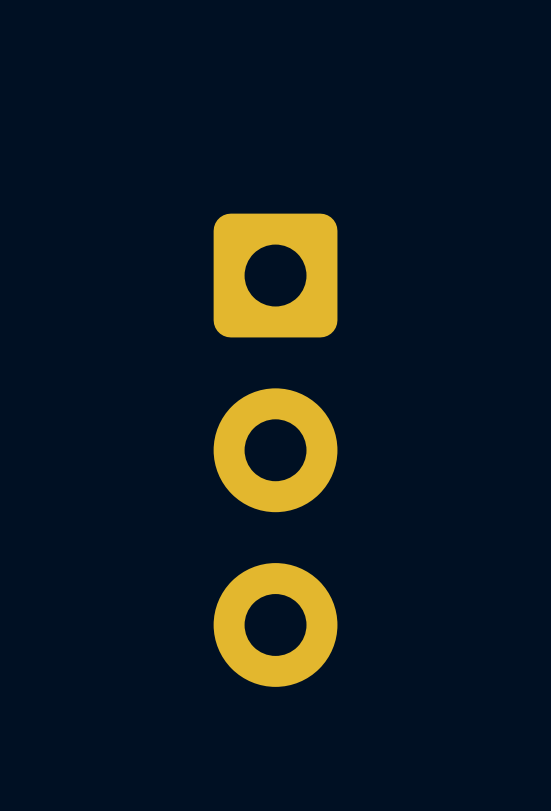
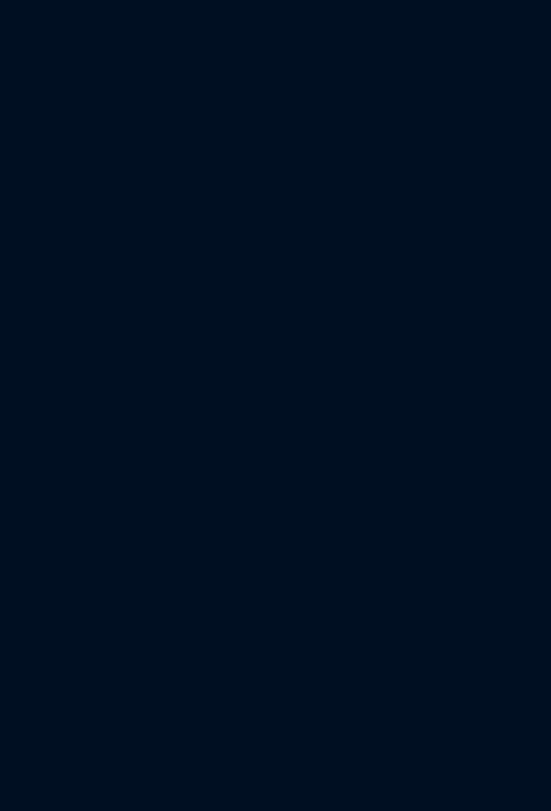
part: (275, 450) -> none

